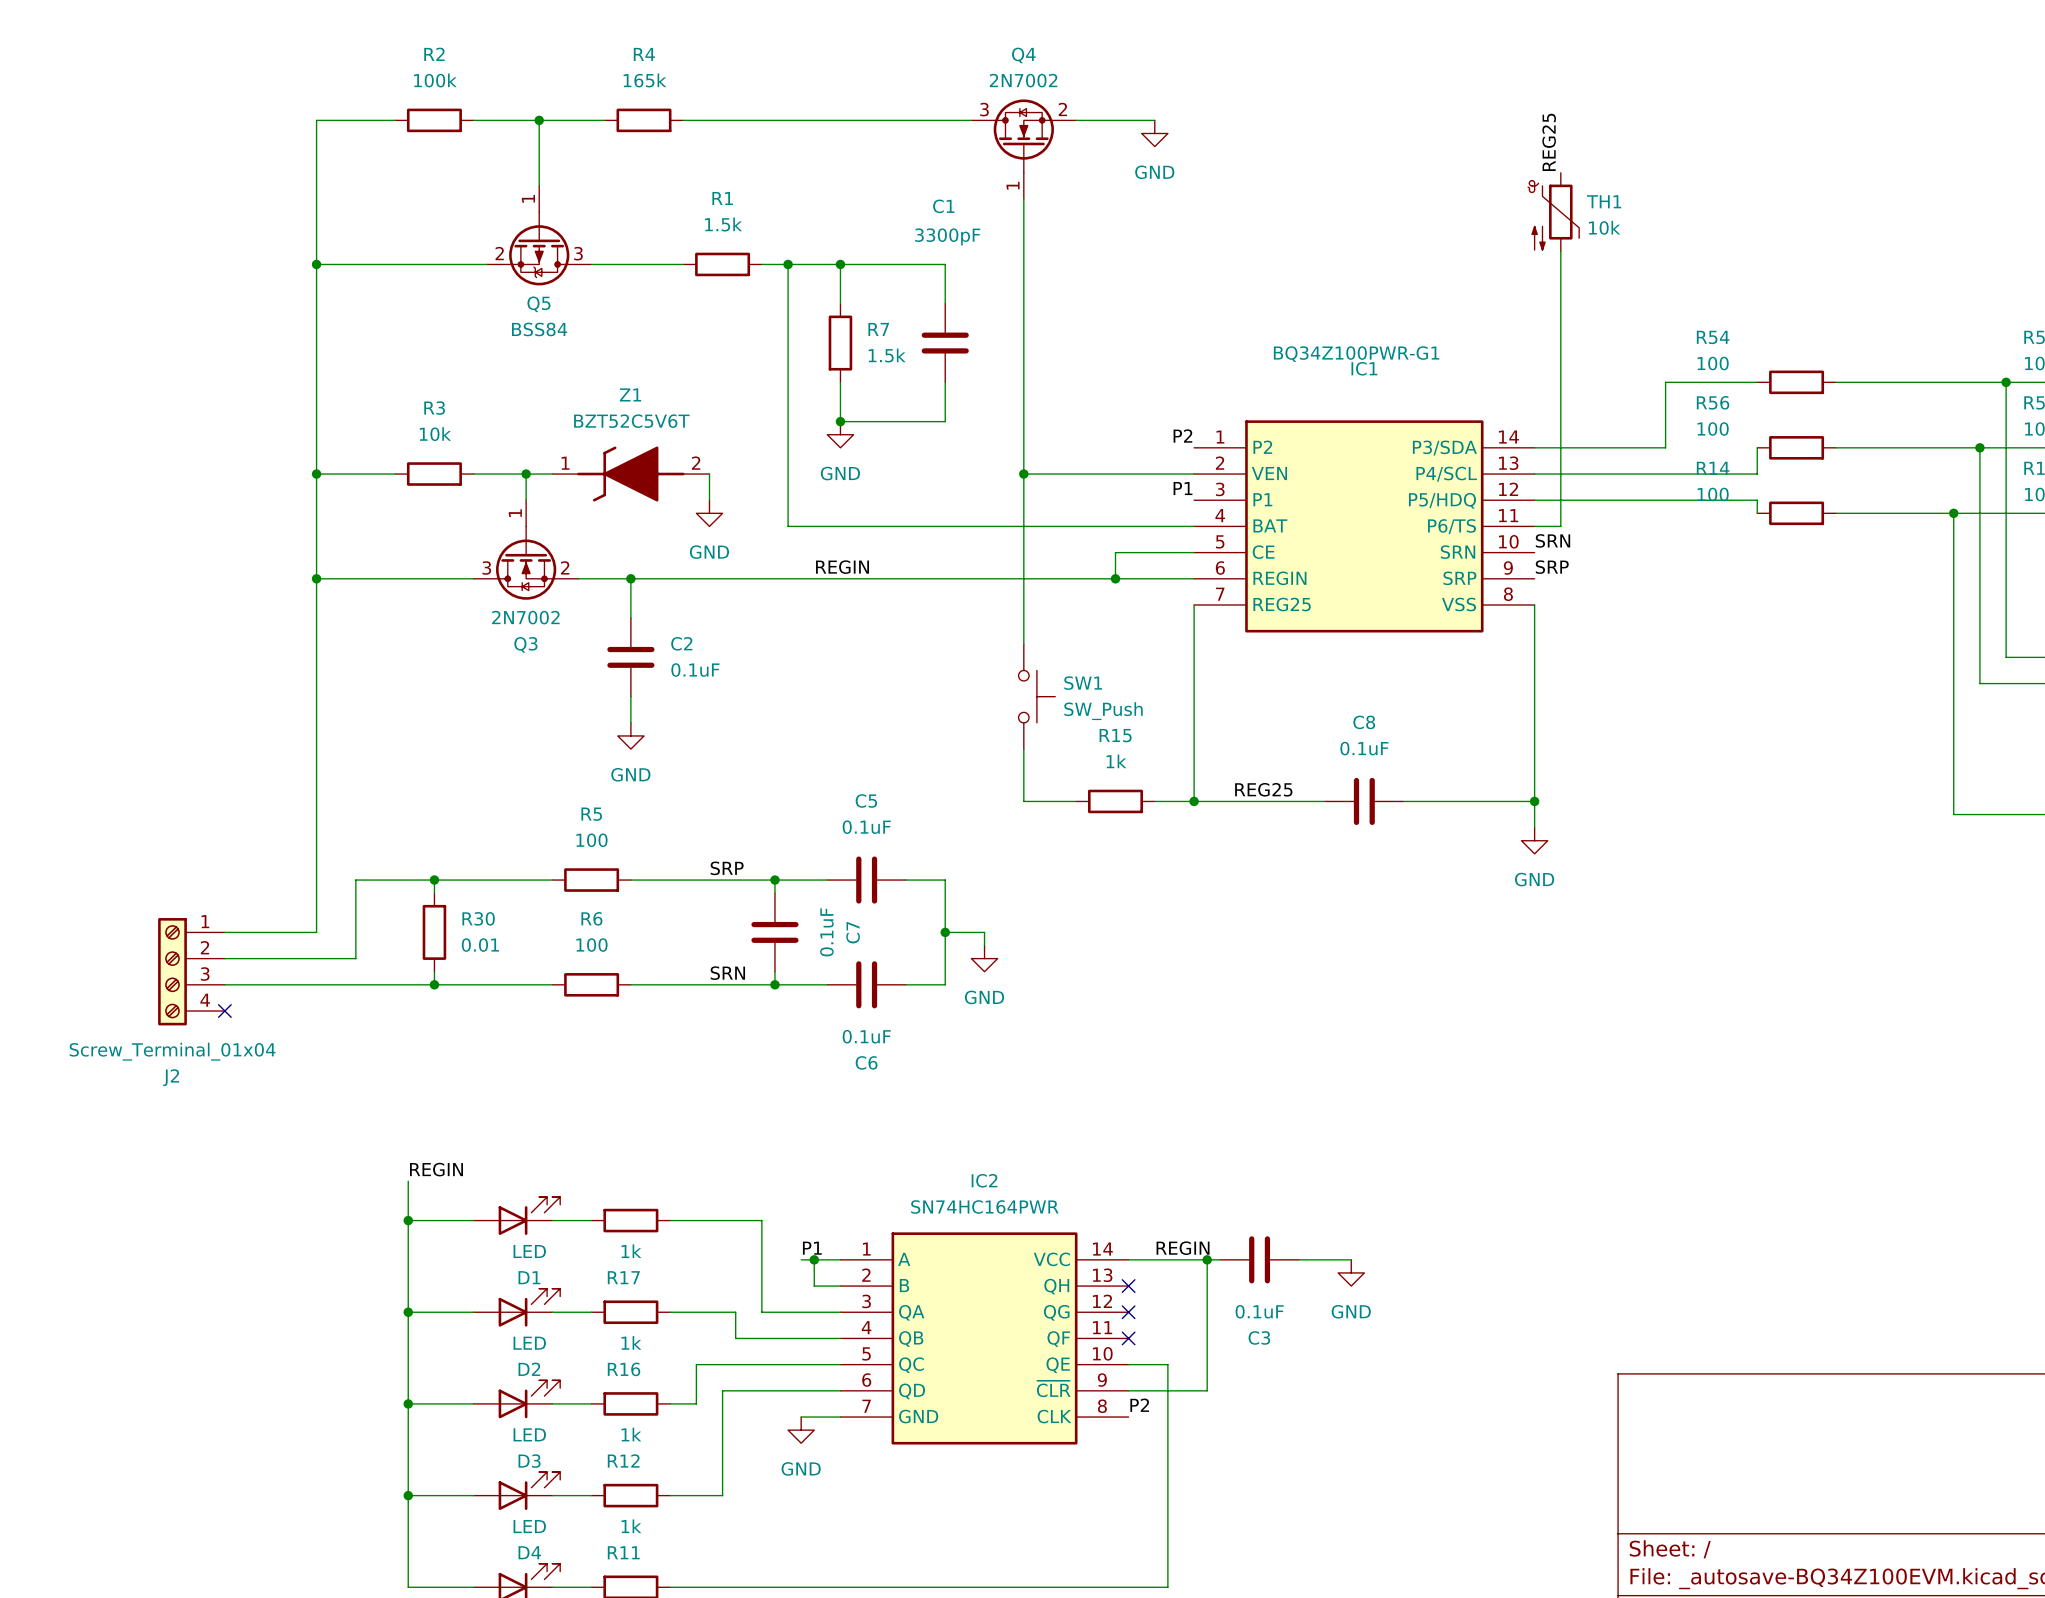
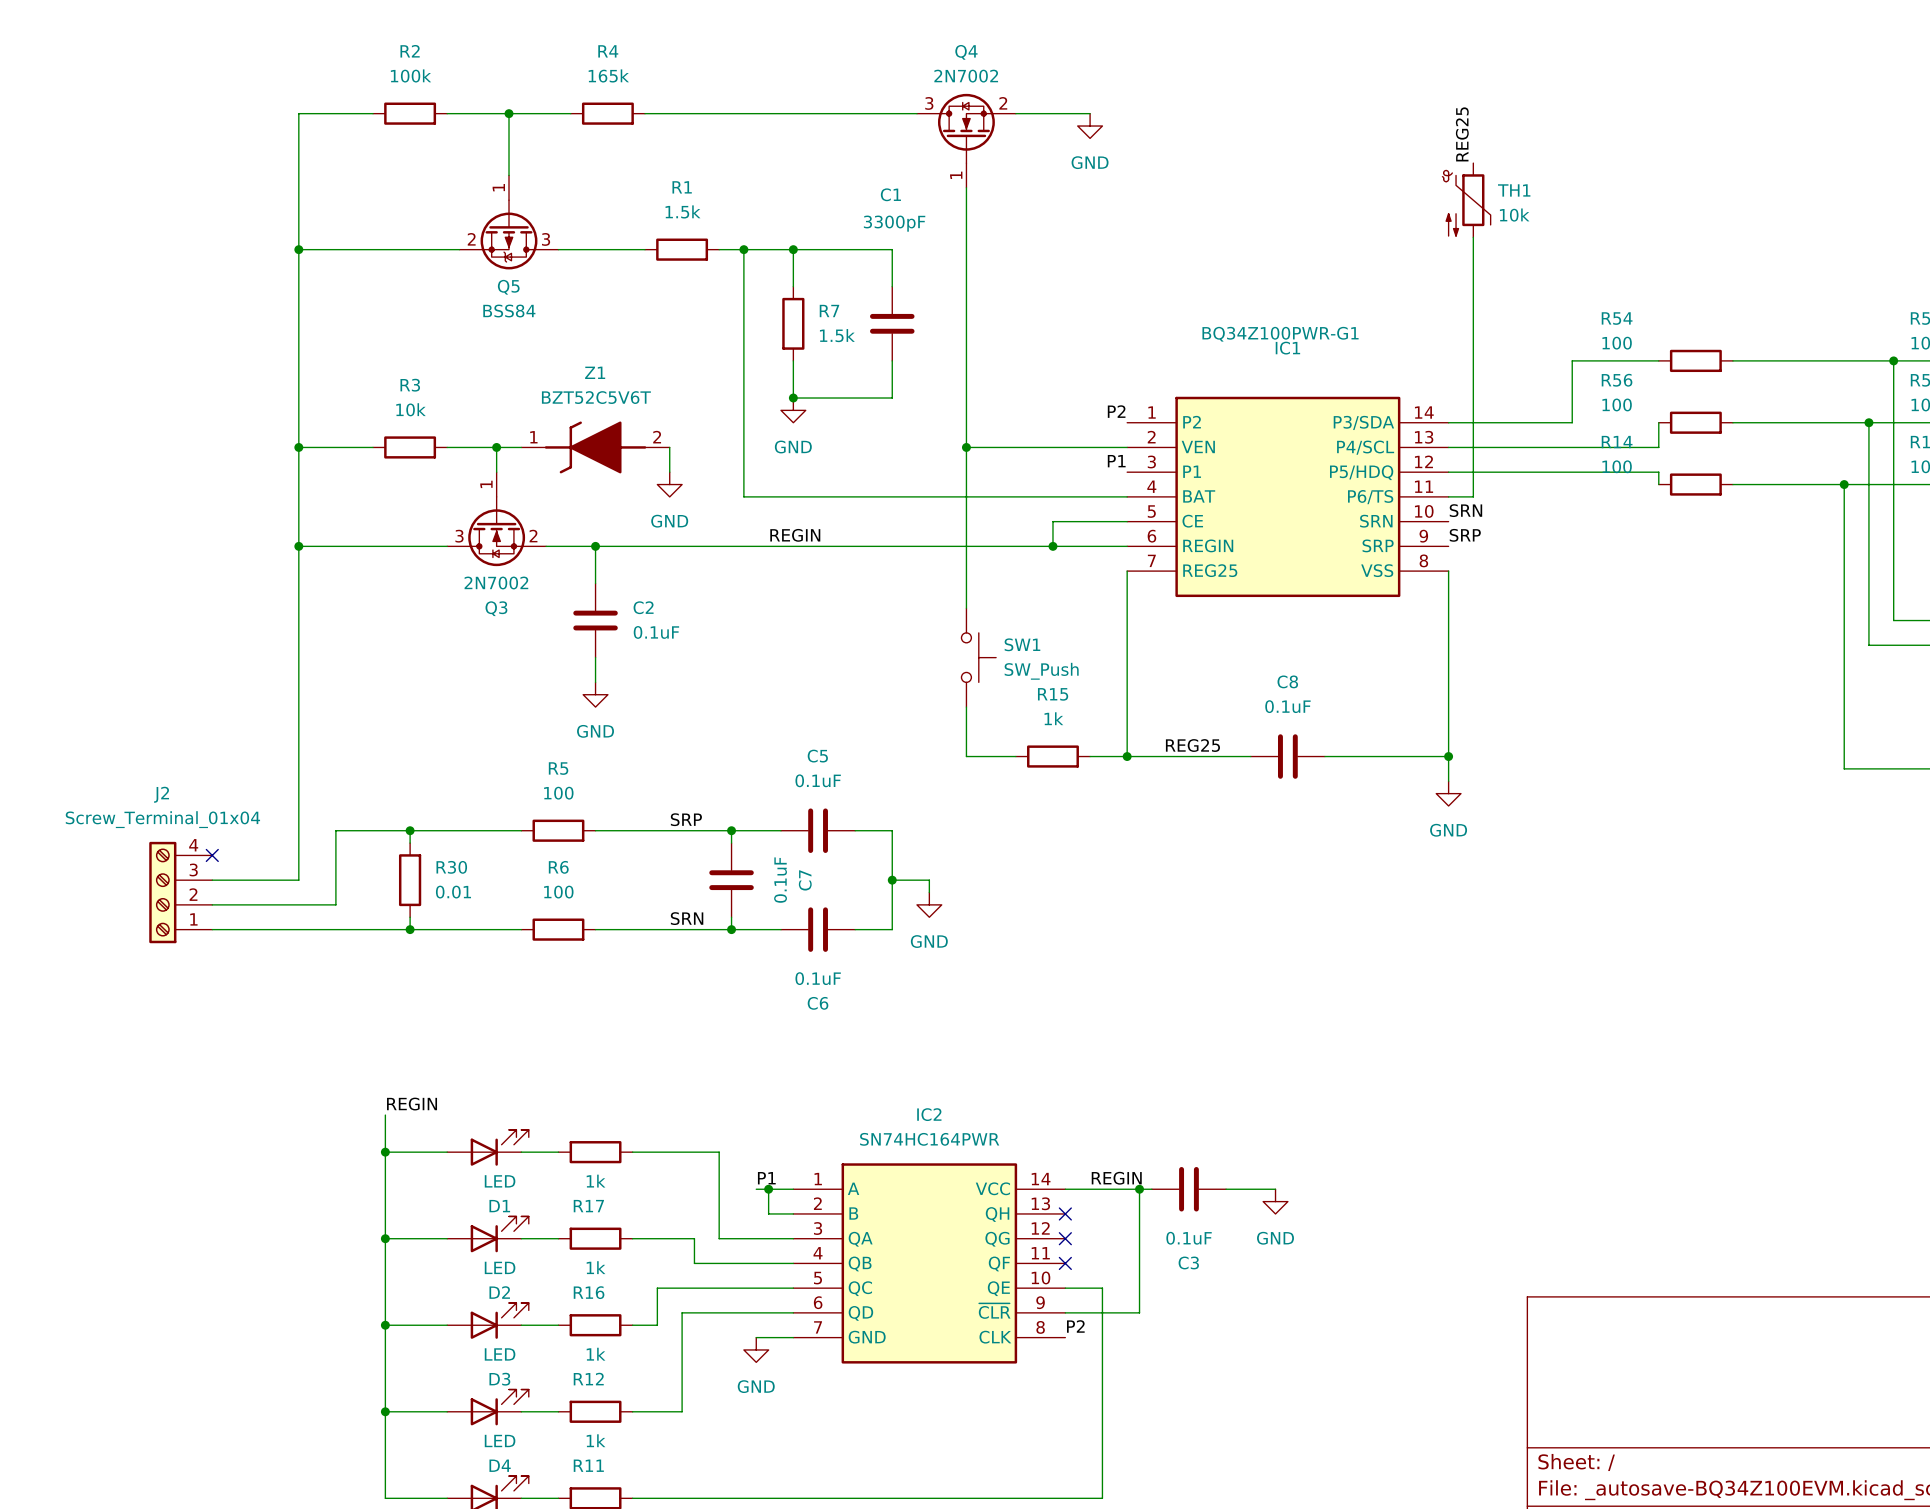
no-connect mark: none -> (212, 855)
J2 flip: as is (172, 971) -> up-down (162, 892)
no-connect mark: (224, 1011) -> none

